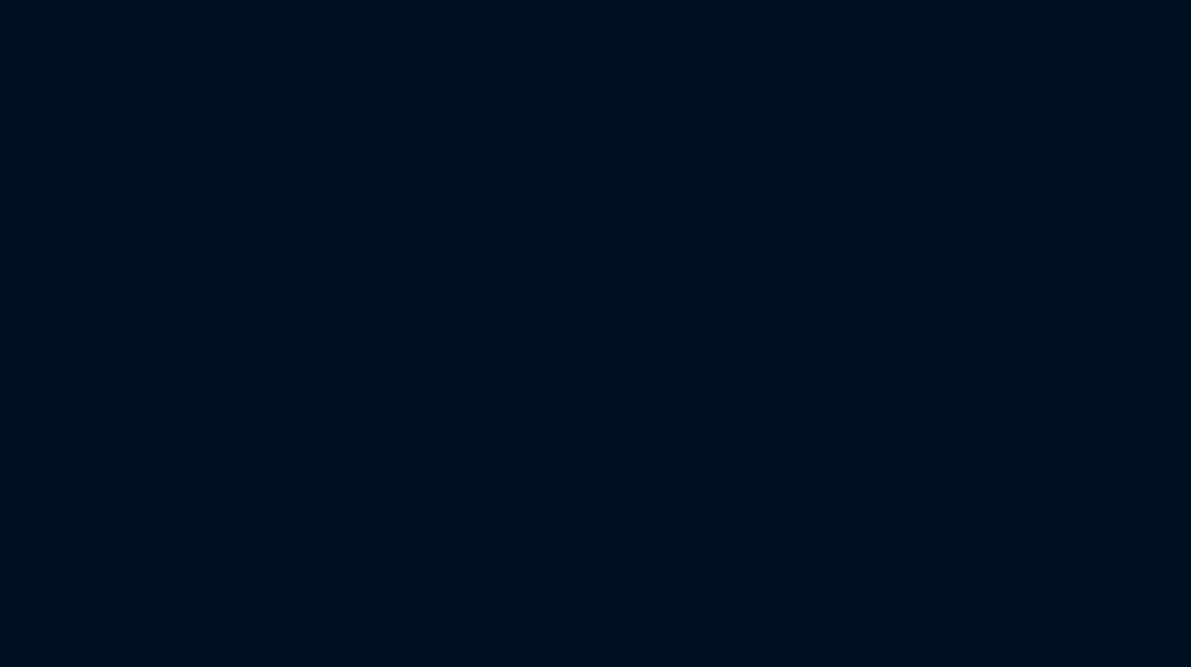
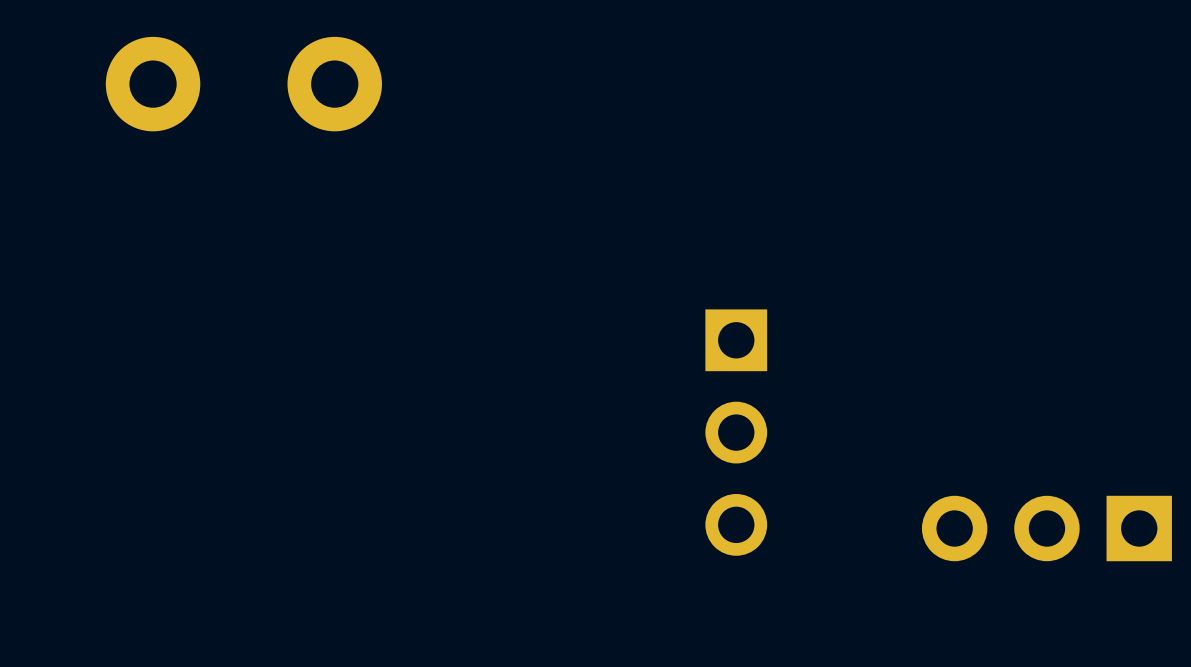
part: none -> (243, 84)
part: none -> (736, 432)
part: none -> (1046, 528)

